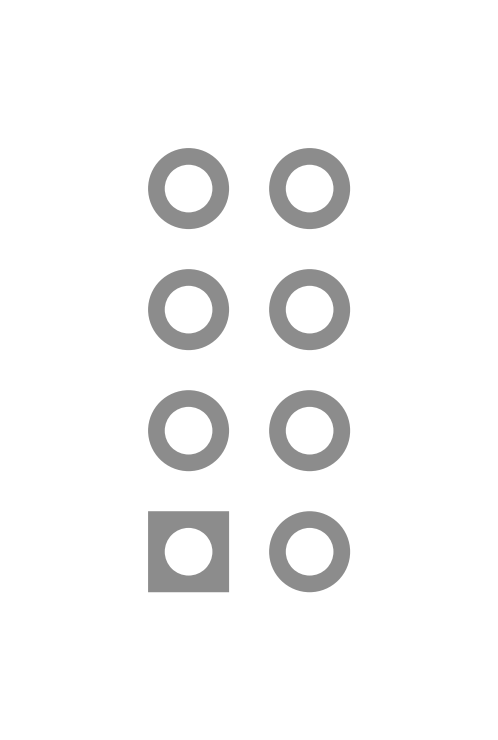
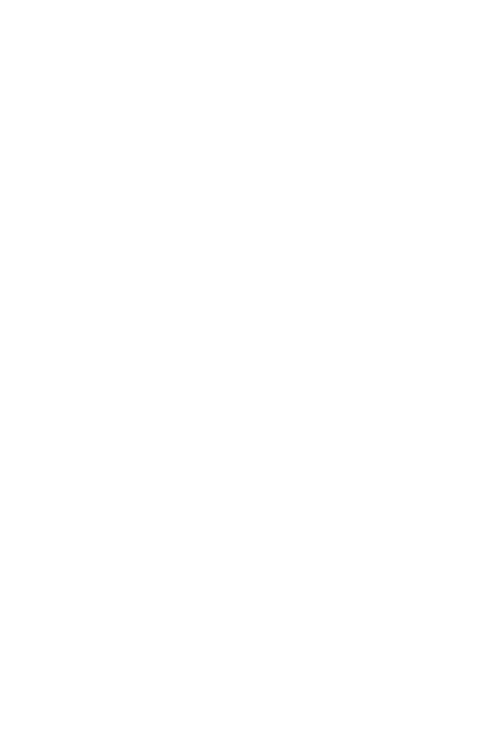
part: (249, 370) -> none

